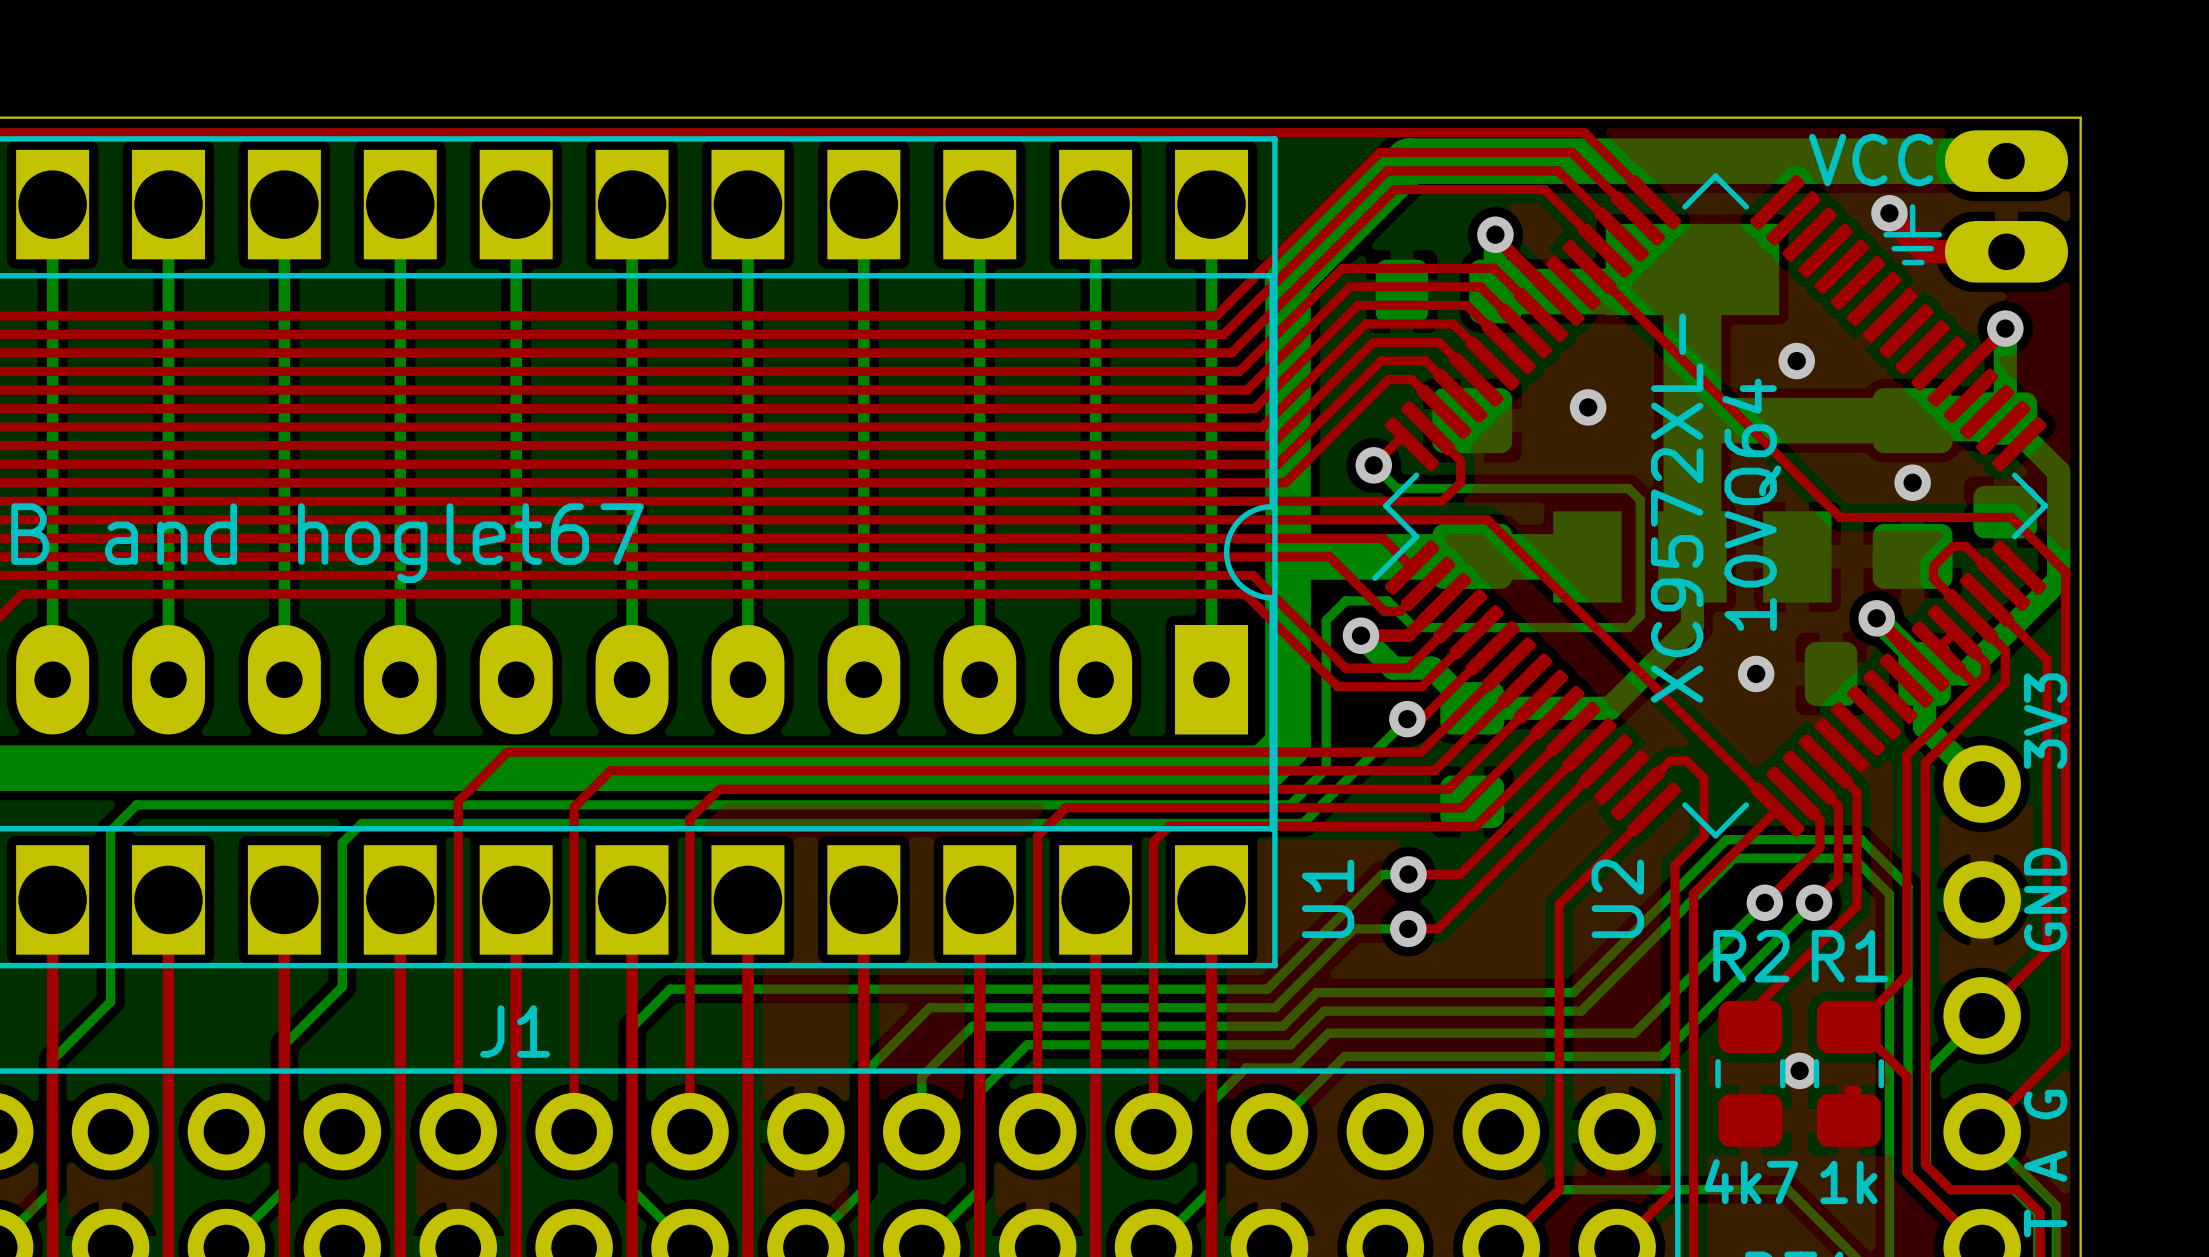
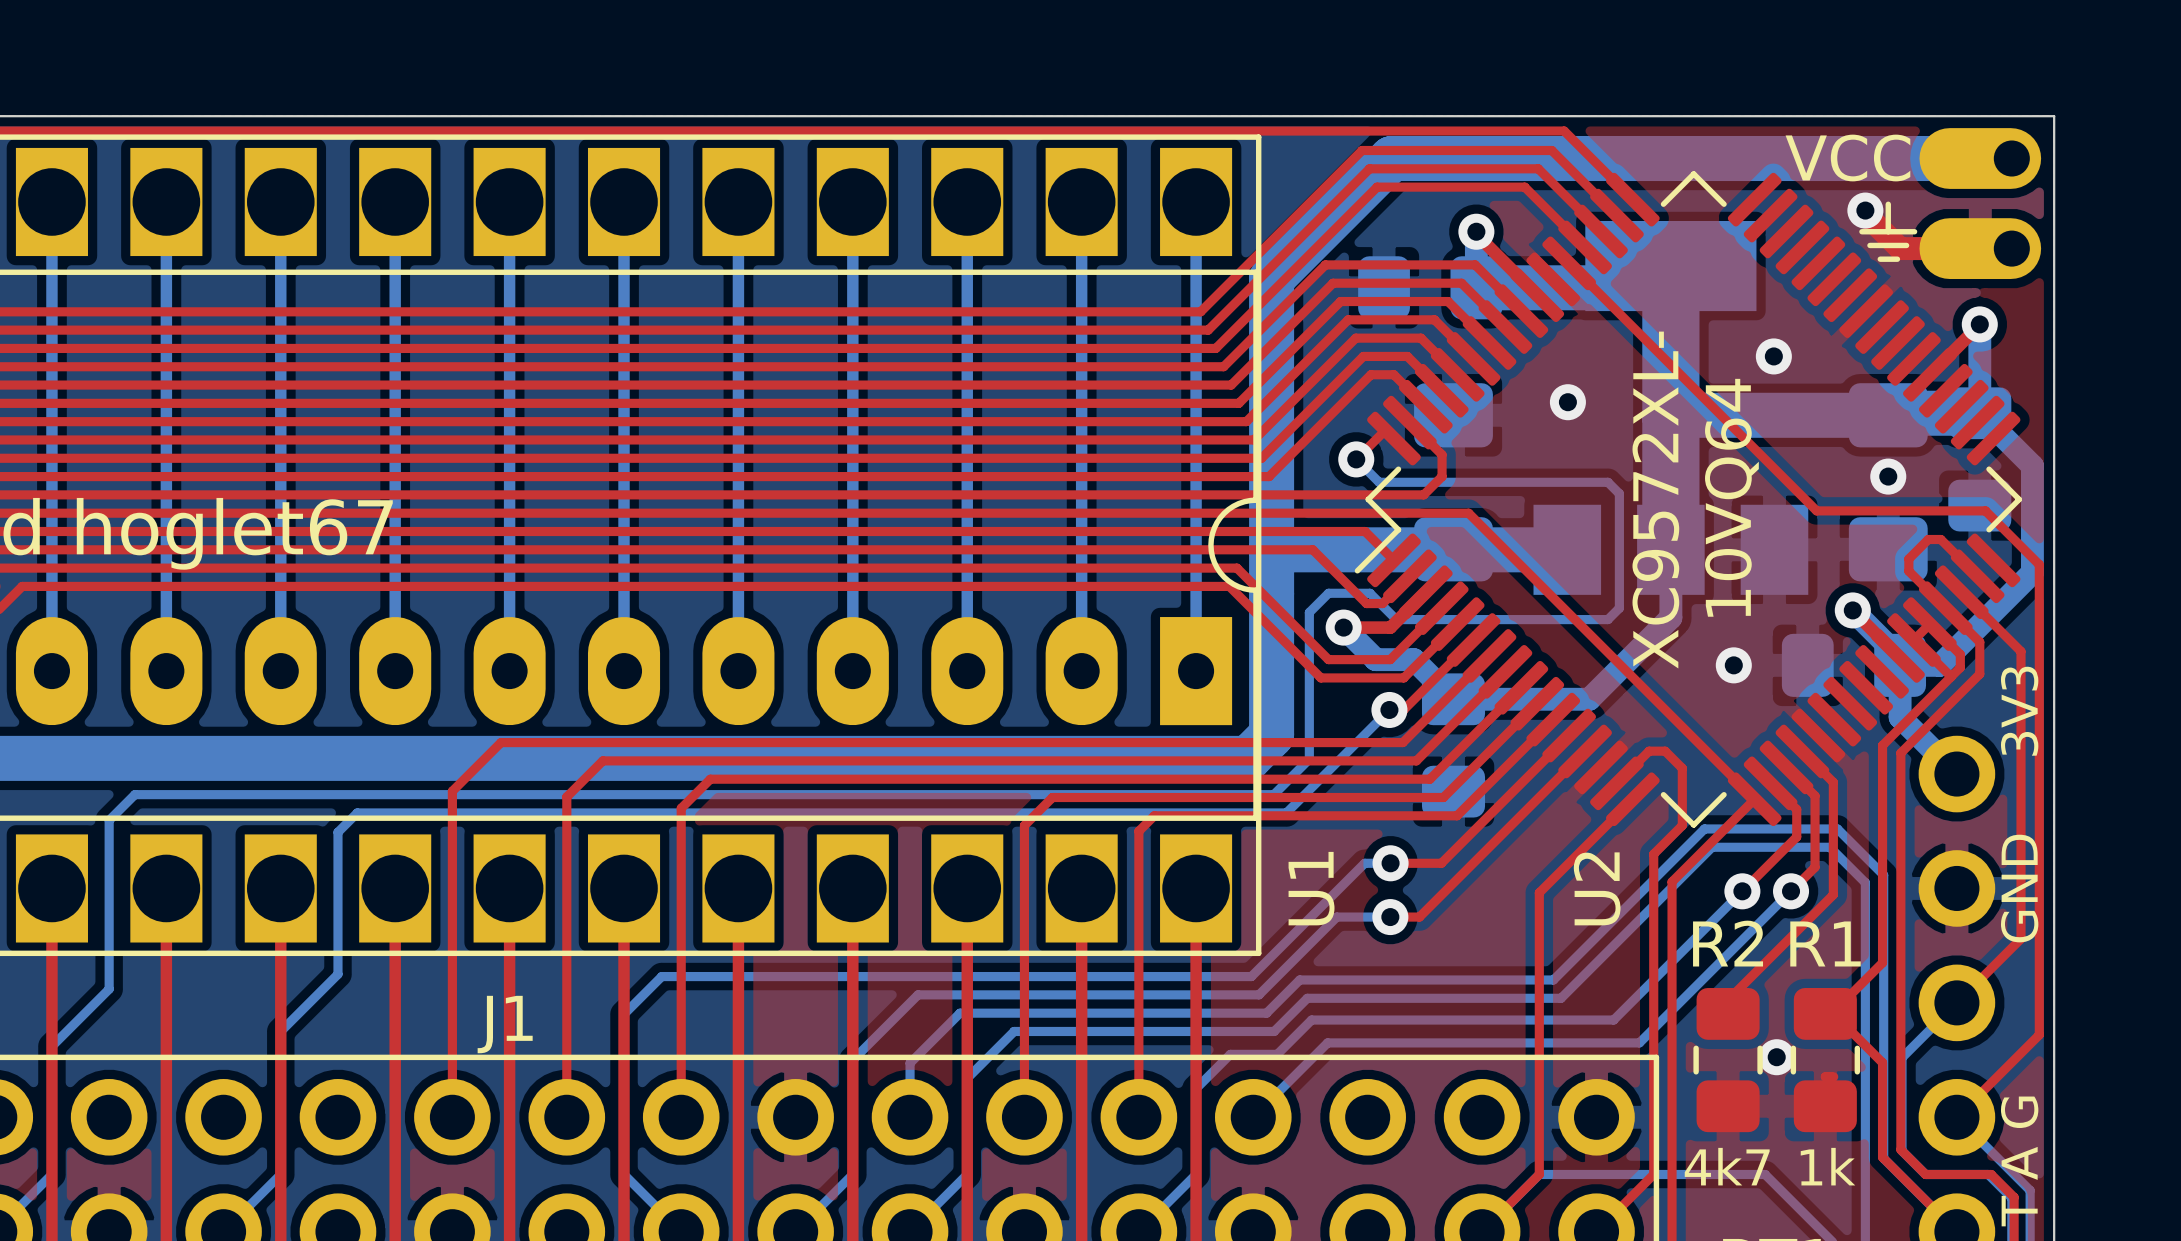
part footprint: [1944, 130, 2069, 283] -> [1919, 128, 2042, 280]
bottom track: (1409, 161) (2006, 161) -> (1391, 158) (2011, 158)

